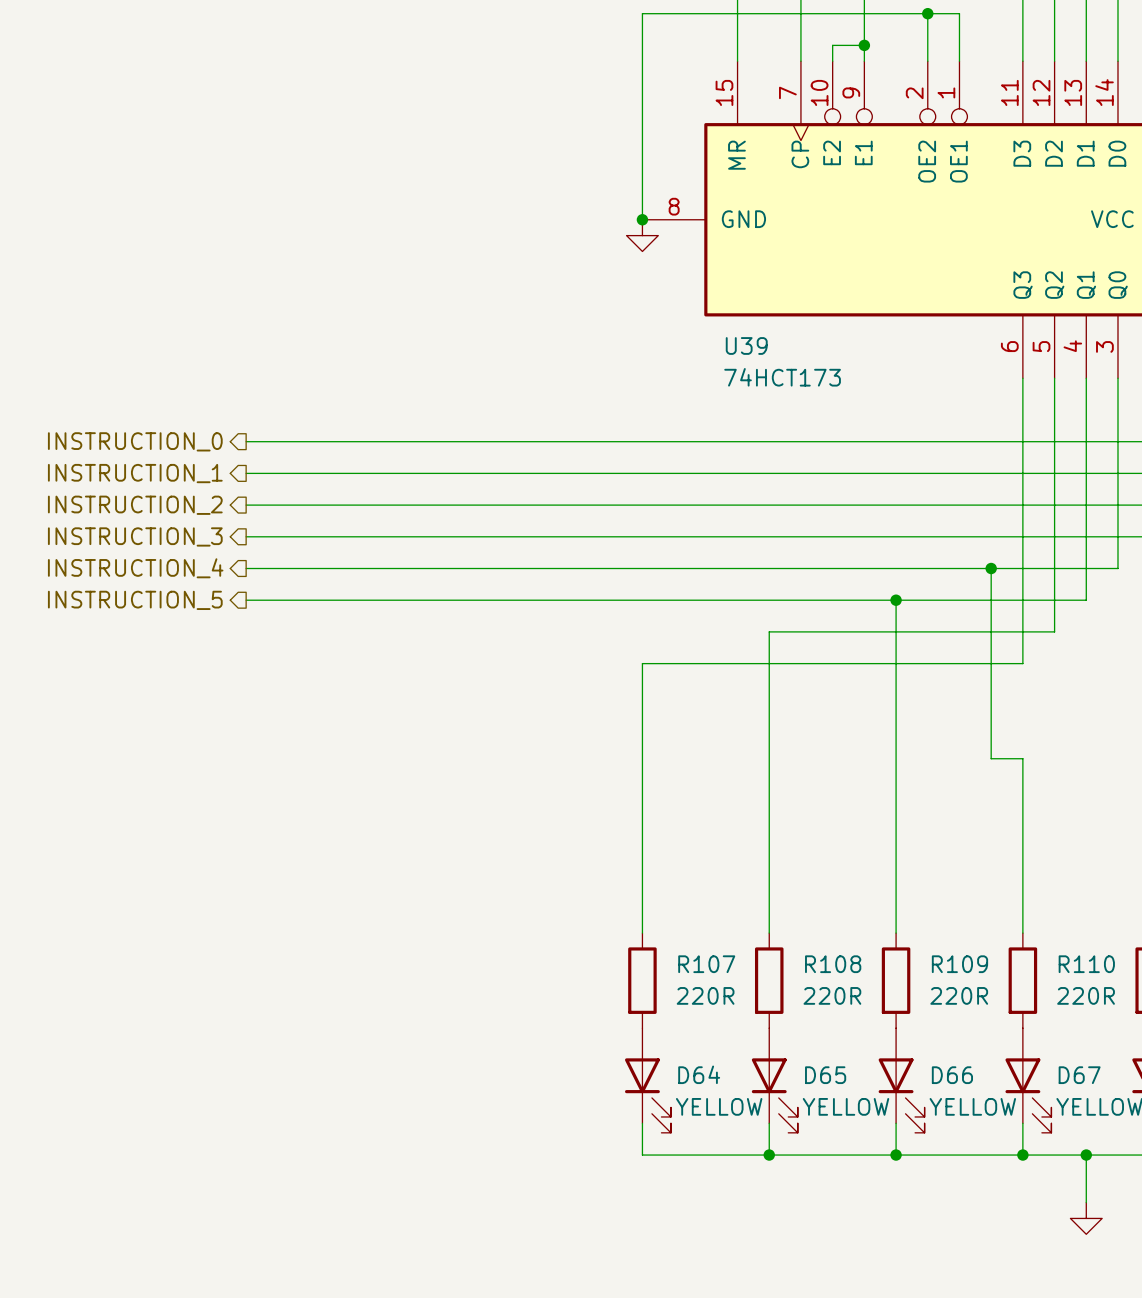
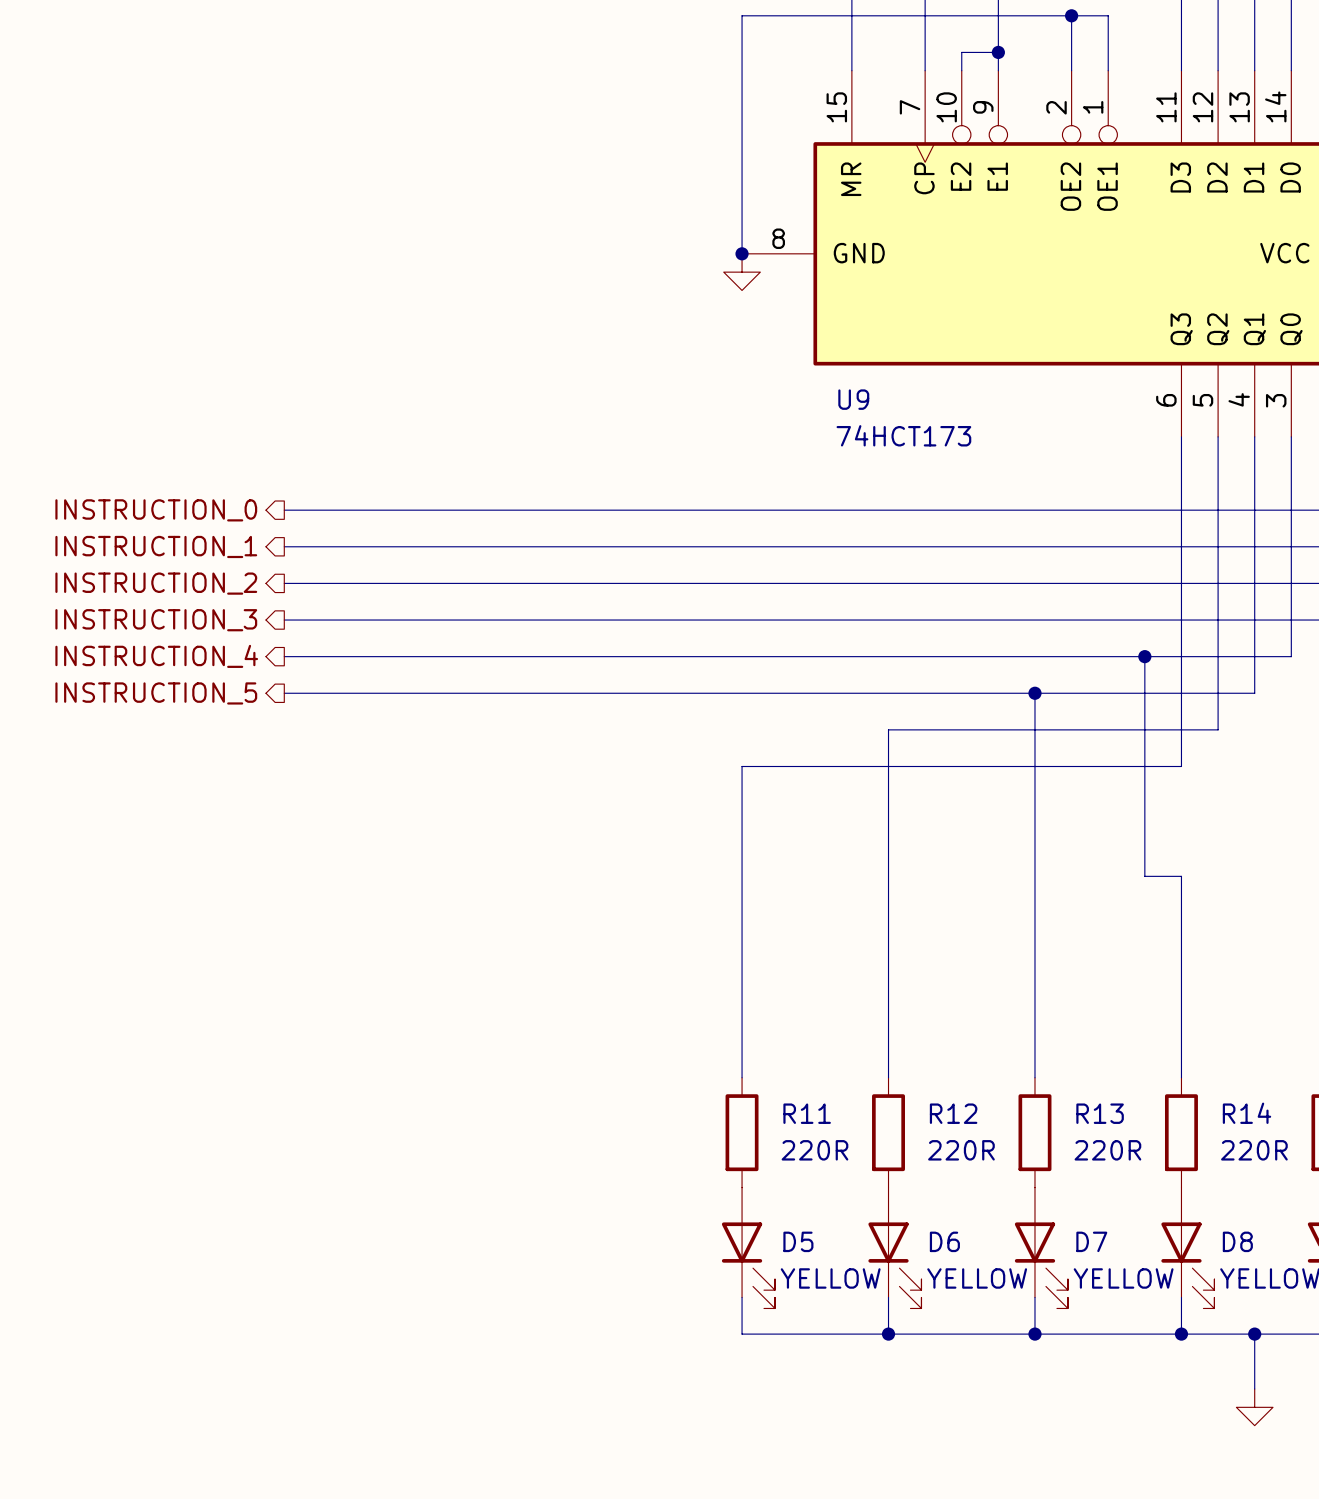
U39 name: U39 (746, 345) -> U9 (853, 399)
R107 name: R107 (706, 964) -> R11 (807, 1113)
R108 name: R108 (833, 964) -> R12 (953, 1113)
R109 name: R109 (959, 964) -> R13 (1100, 1113)
R110 name: R110 (1086, 964) -> R14 (1246, 1113)
D64 name: D64 (699, 1074) -> D5 (798, 1241)
D65 name: D65 (825, 1075) -> D6 (944, 1241)
D66 name: D66 (952, 1075) -> D7 (1091, 1241)
D67 name: D67 (1079, 1075) -> D8 (1237, 1241)

